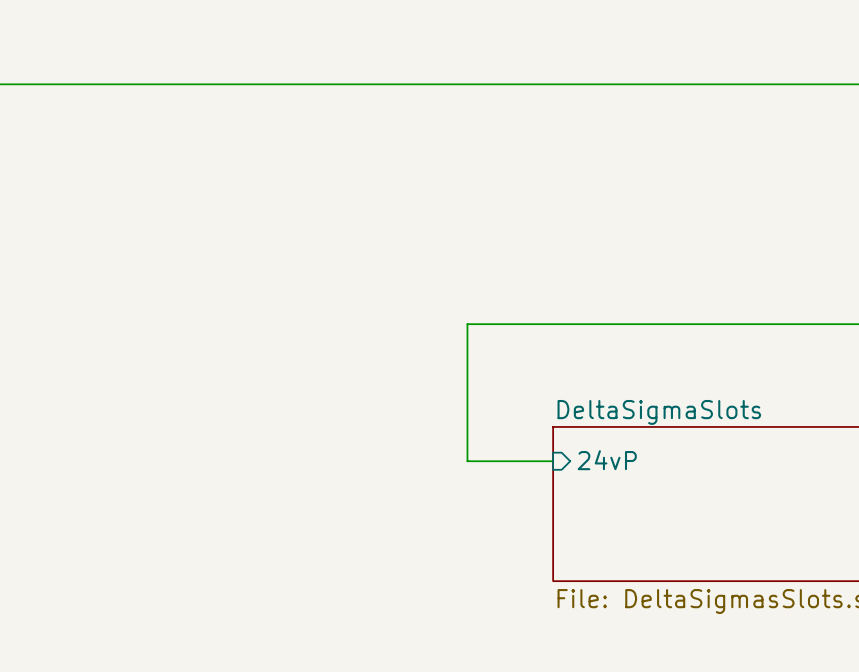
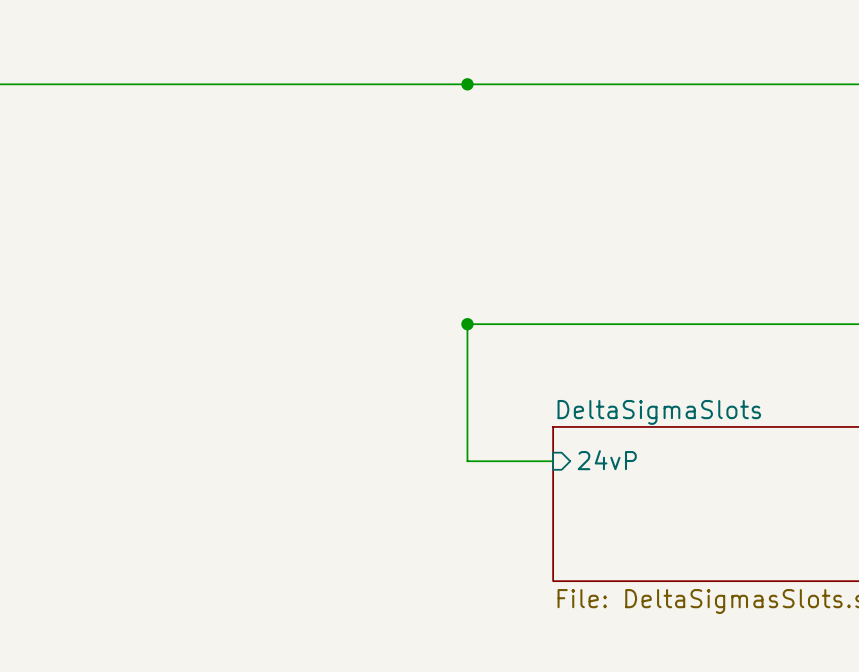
junction: none -> (467, 84)
junction: none -> (467, 324)

